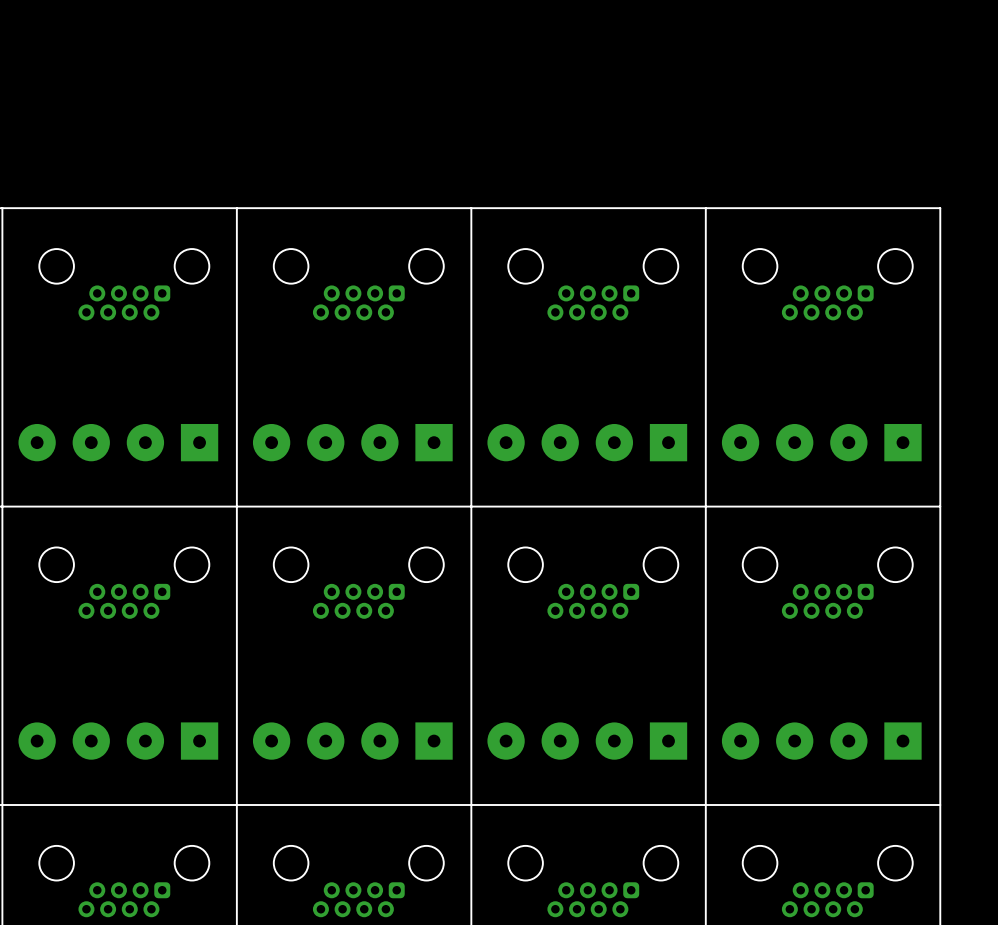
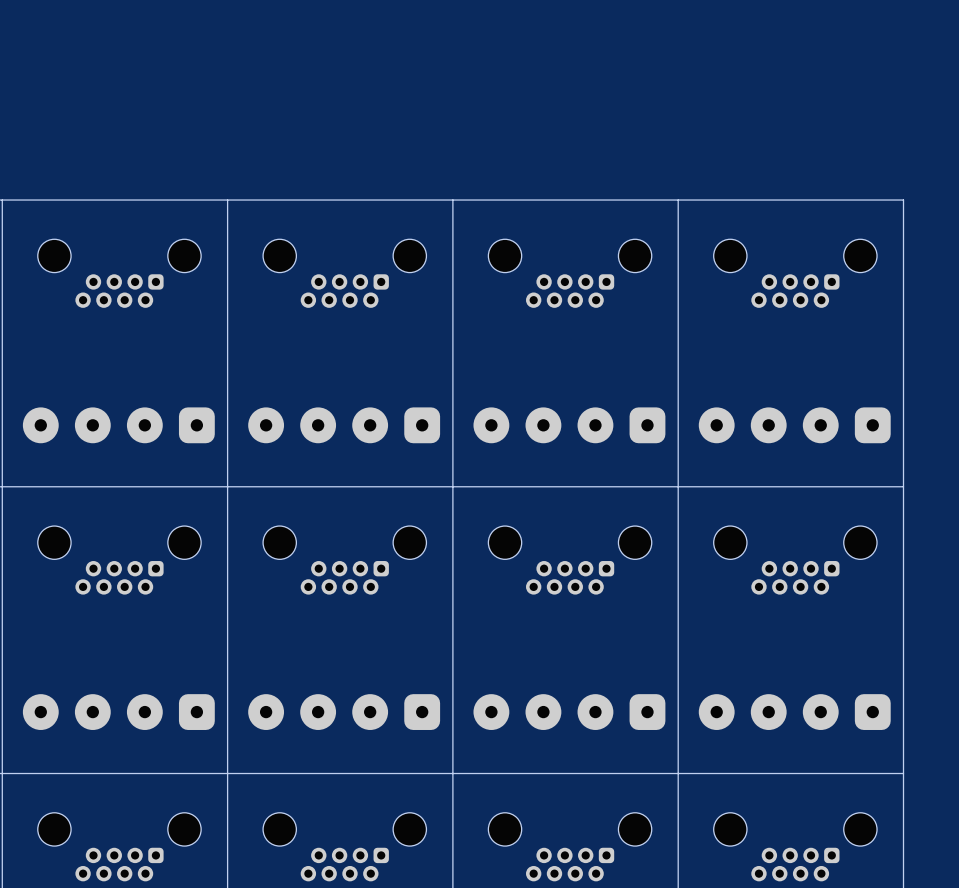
part footprint: [18, 423, 219, 462] -> [22, 407, 215, 444]
part footprint: [252, 423, 453, 462] -> [248, 407, 441, 444]
part footprint: [487, 423, 688, 462] -> [473, 407, 666, 444]
part footprint: [721, 423, 922, 462] -> [698, 407, 891, 444]
part footprint: [18, 722, 219, 760] -> [22, 694, 215, 730]
part footprint: [252, 722, 453, 760] -> [248, 694, 441, 730]
part footprint: [487, 722, 688, 760] -> [473, 694, 666, 730]
part footprint: [721, 722, 922, 760] -> [698, 694, 891, 730]

